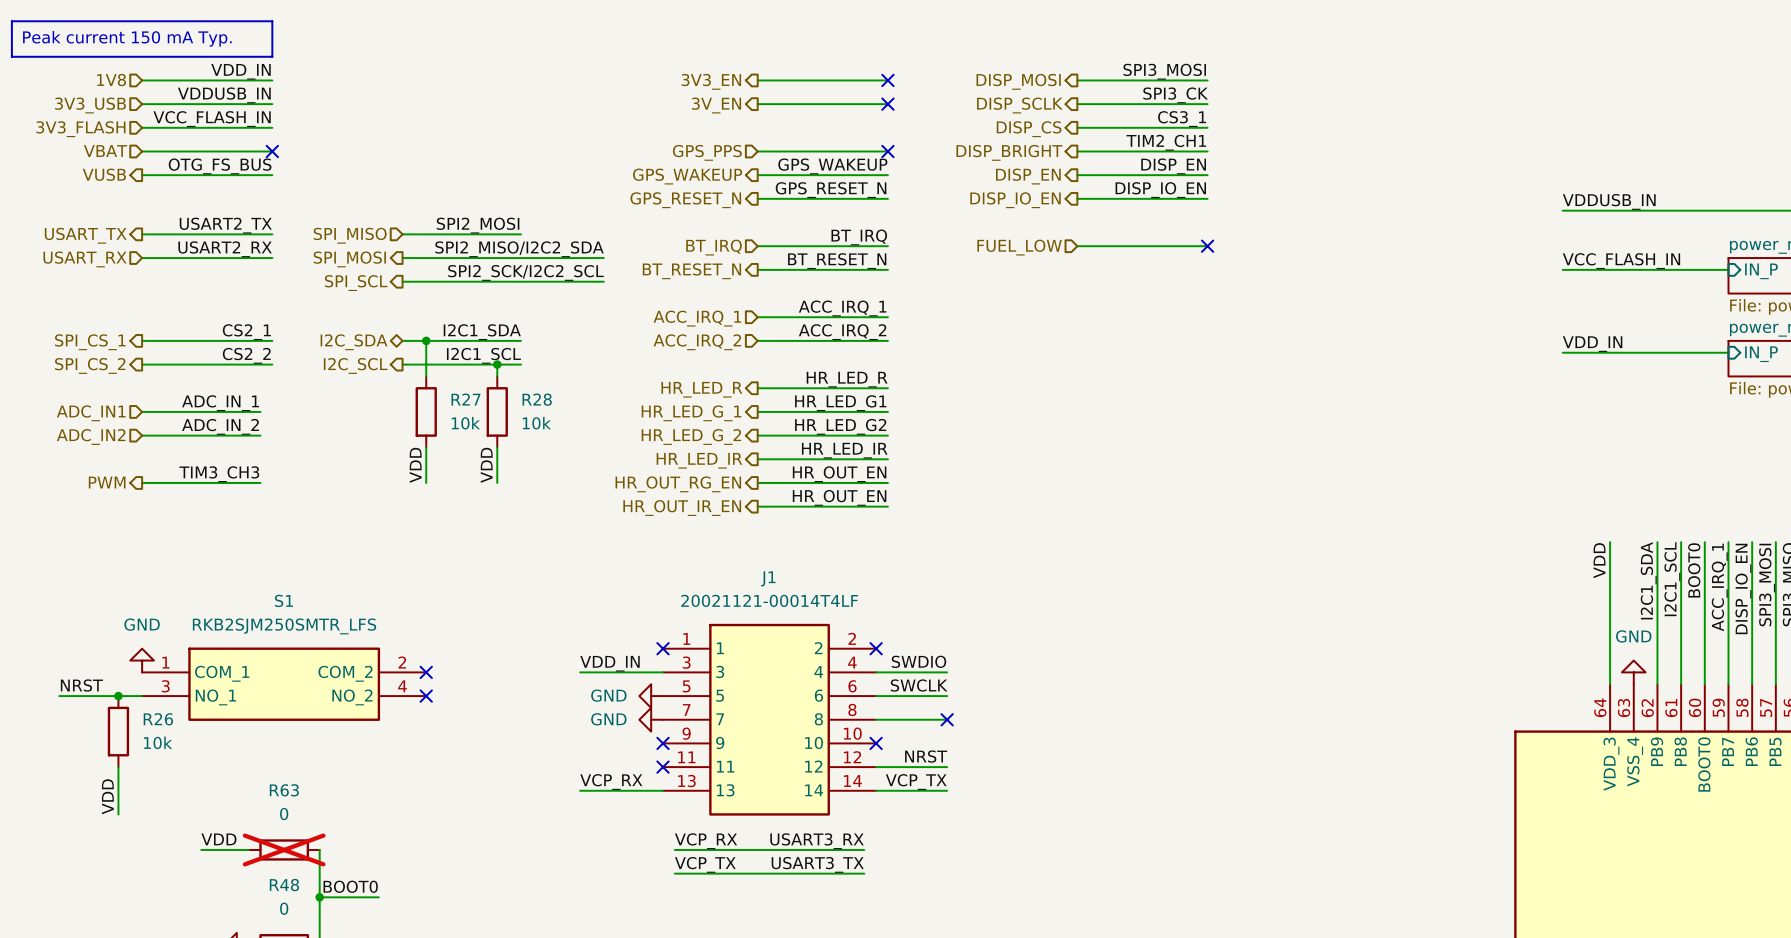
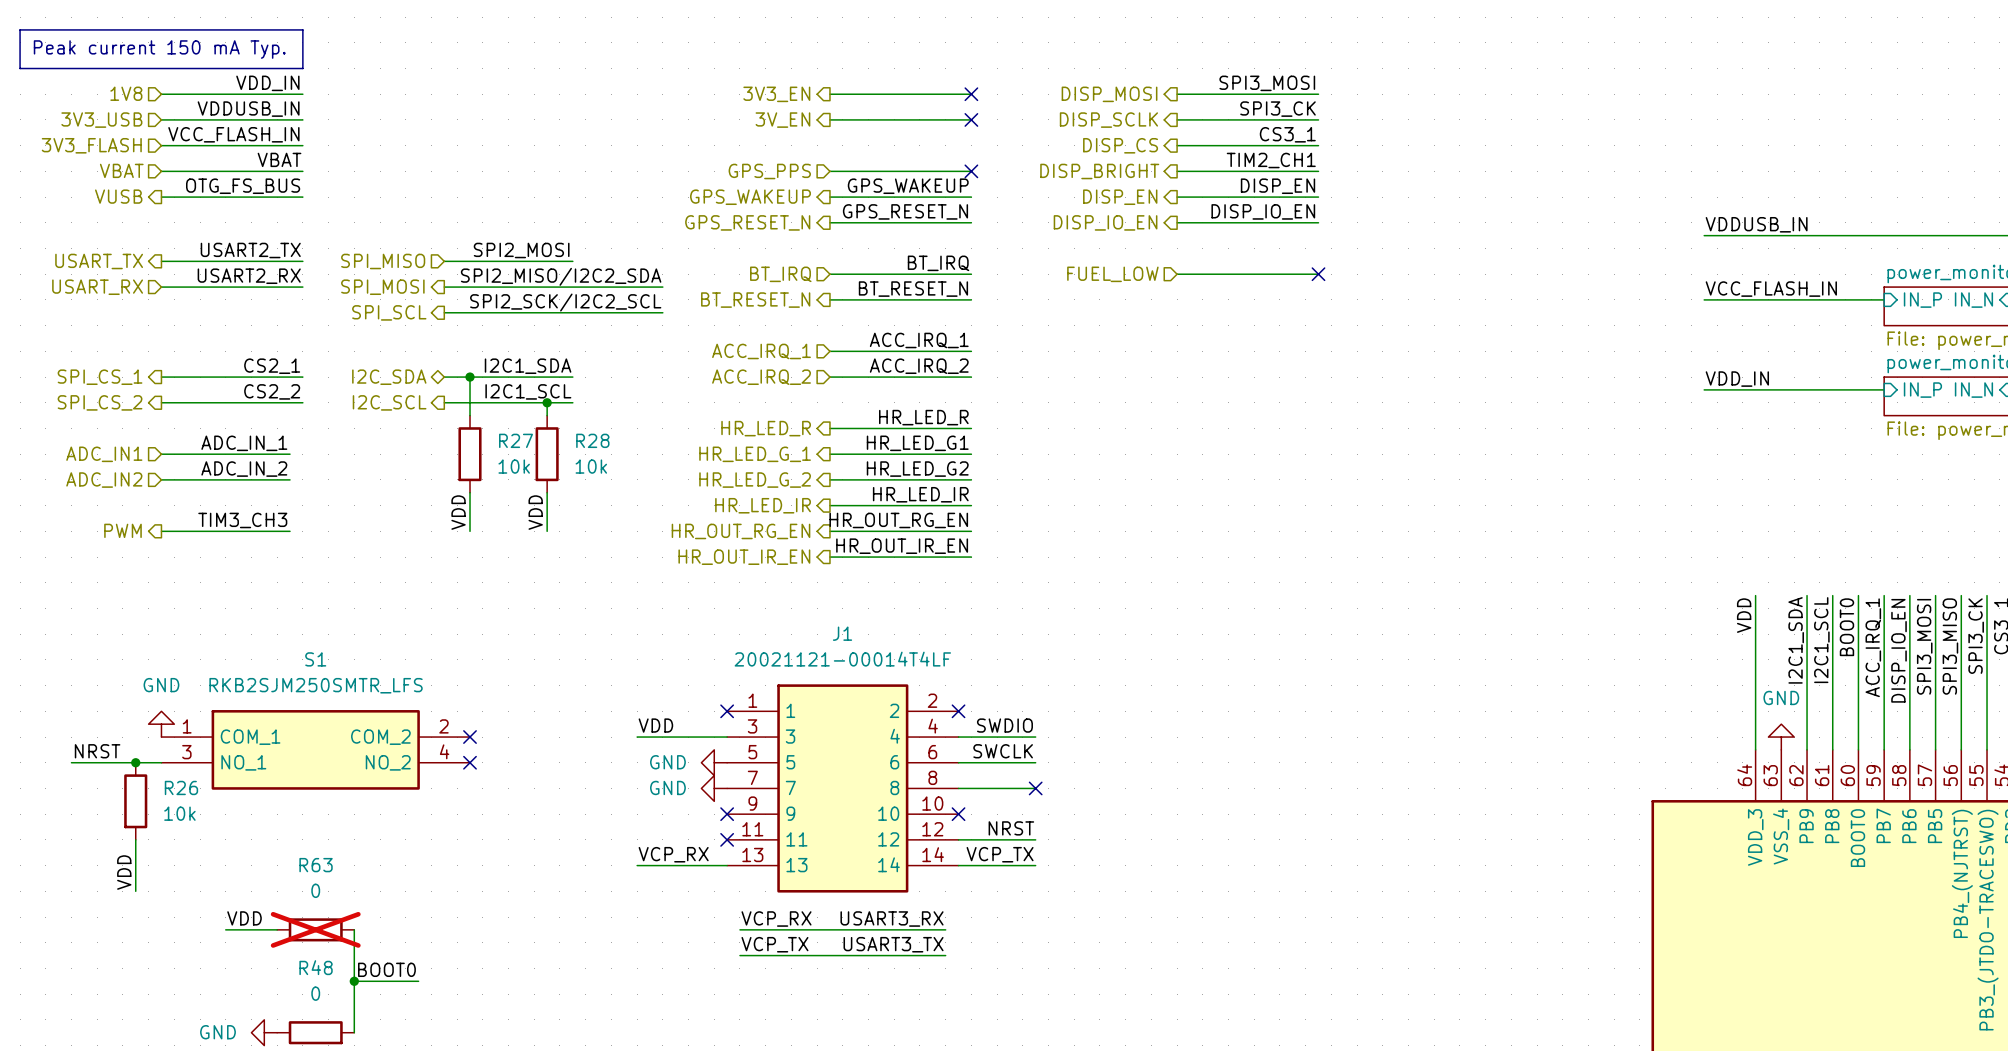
label: none -> VBAT (279, 159)
no-connect mark: (272, 151) -> none
label: HR_OUT_EN (839, 474) -> HR_OUT_RG_EN (898, 520)
label: HR_OUT_EN (839, 497) -> HR_OUT_IR_EN (902, 546)
label: VDD_IN (609, 663) -> VDD (655, 725)

